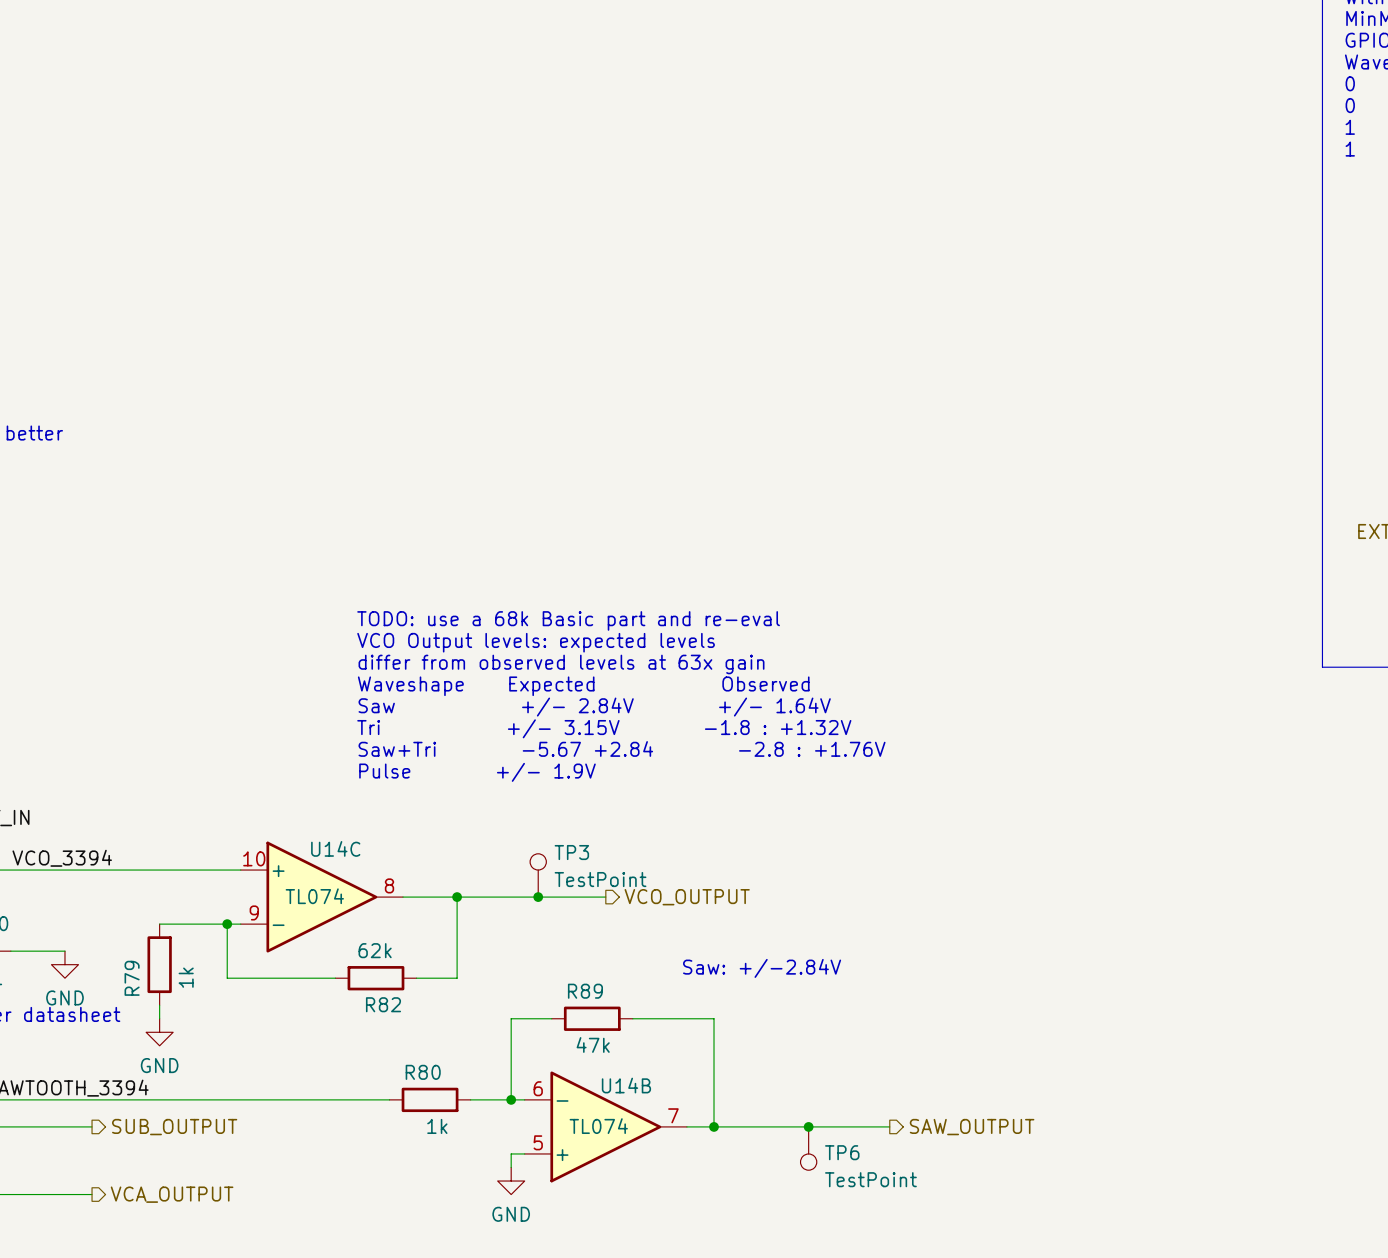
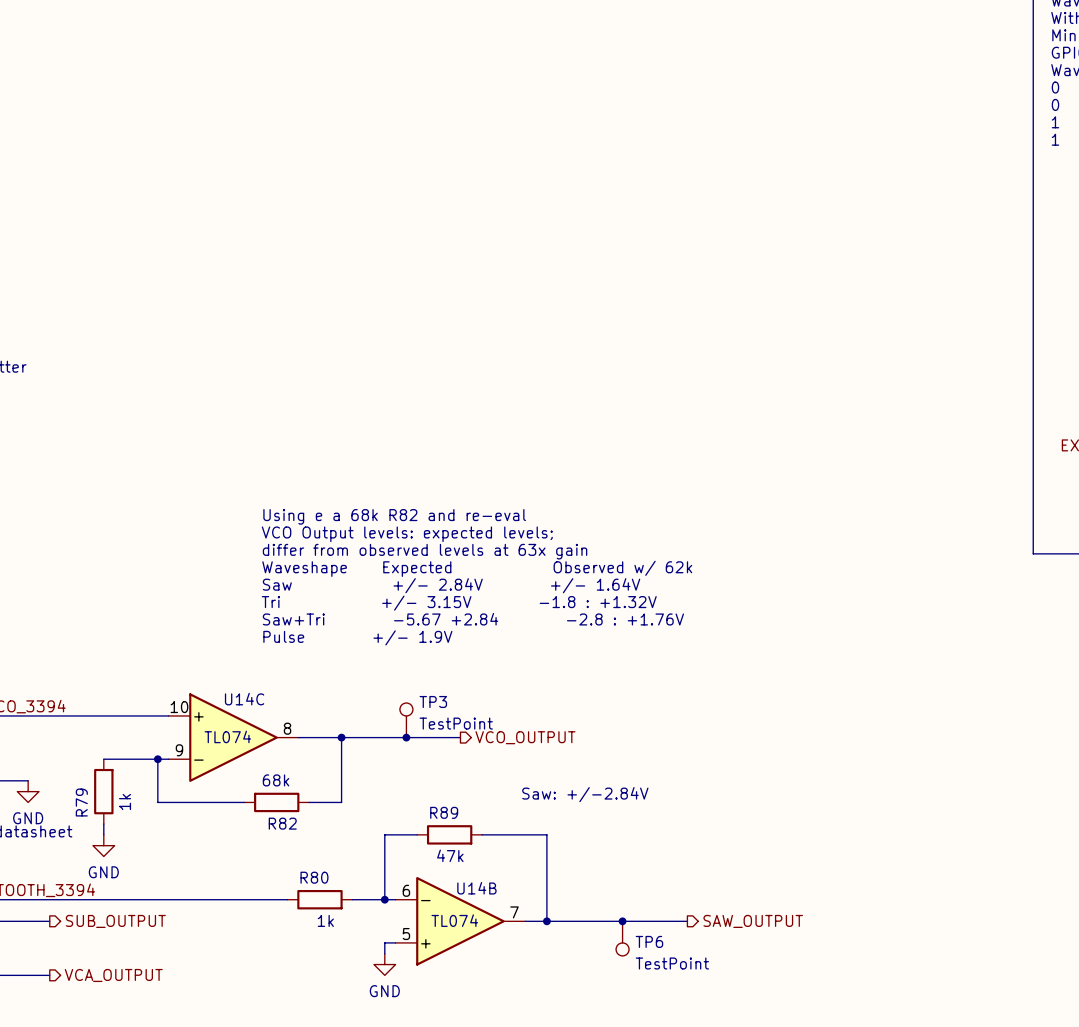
text: TODO: use a 68k Basic part and re-eval (568, 620) -> Using e a 68k R82 and re-eval (394, 516)
text: VCO Output levels: expected levels (536, 642) -> VCO Output levels: expected levels; (407, 534)
text: Waveshape Expected Observed (583, 686) -> Waveshape Expected Observed w/ 62k (477, 568)
R82 value: 62k (375, 950) -> 68k (276, 780)

